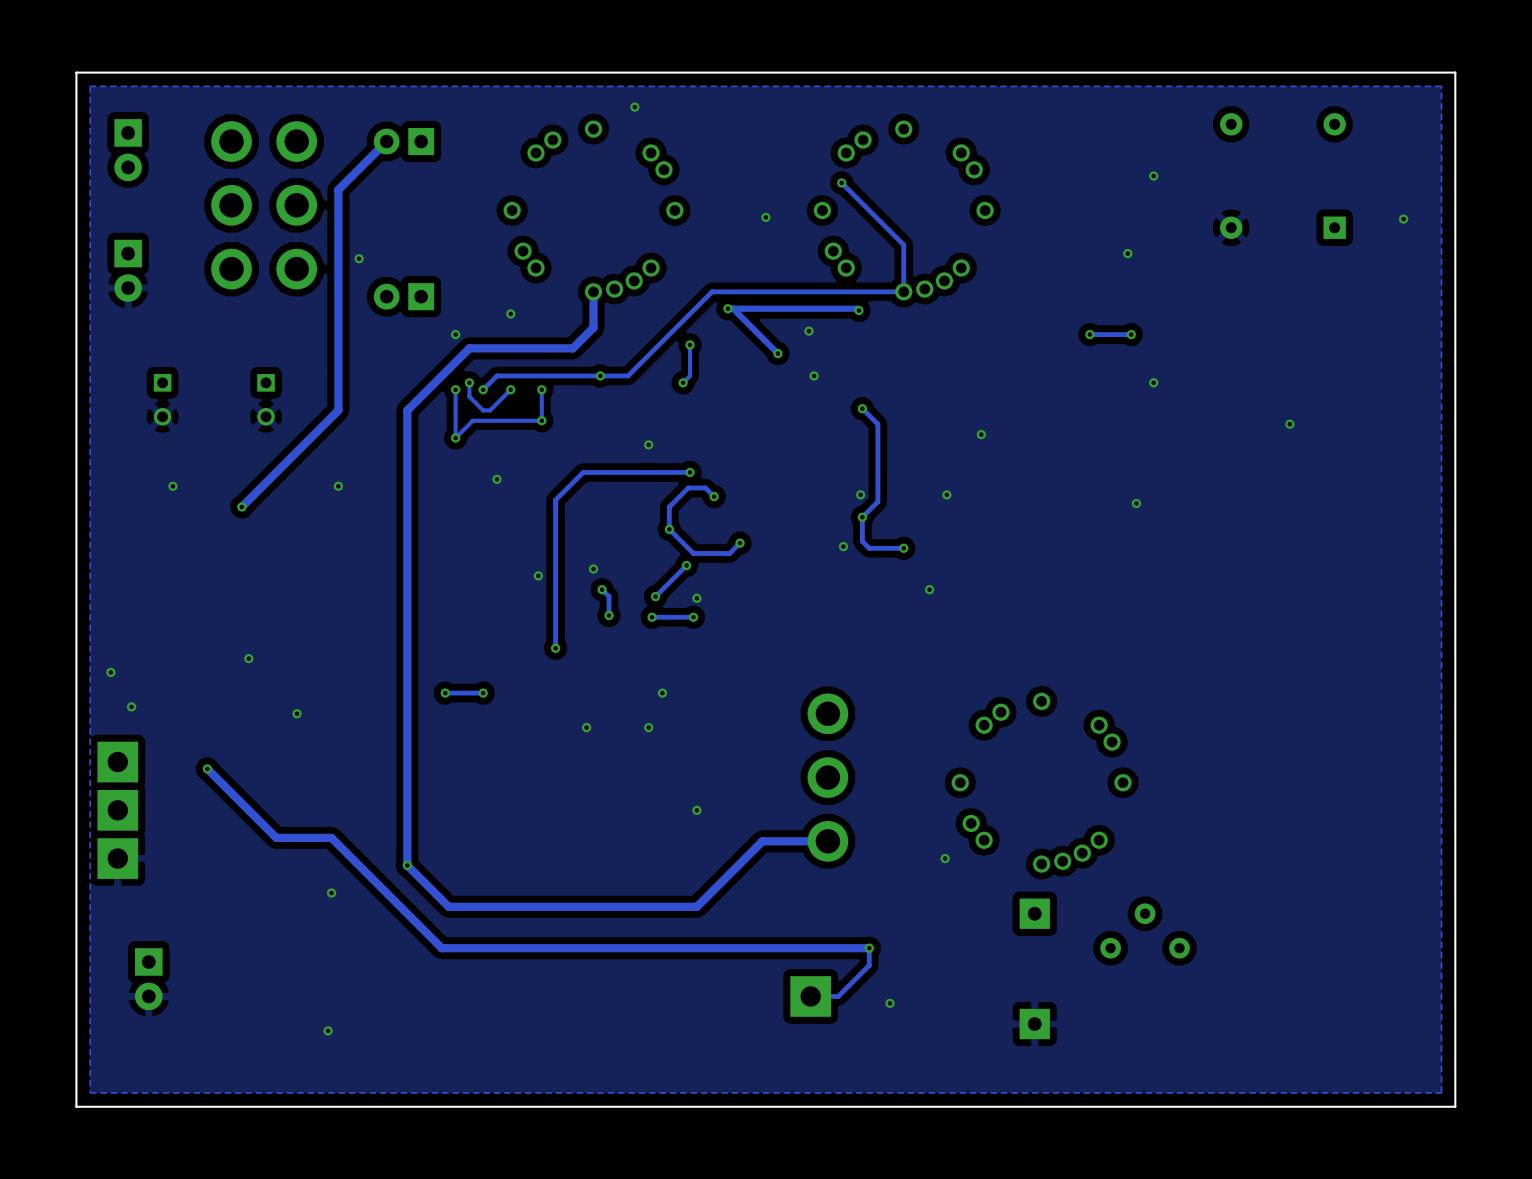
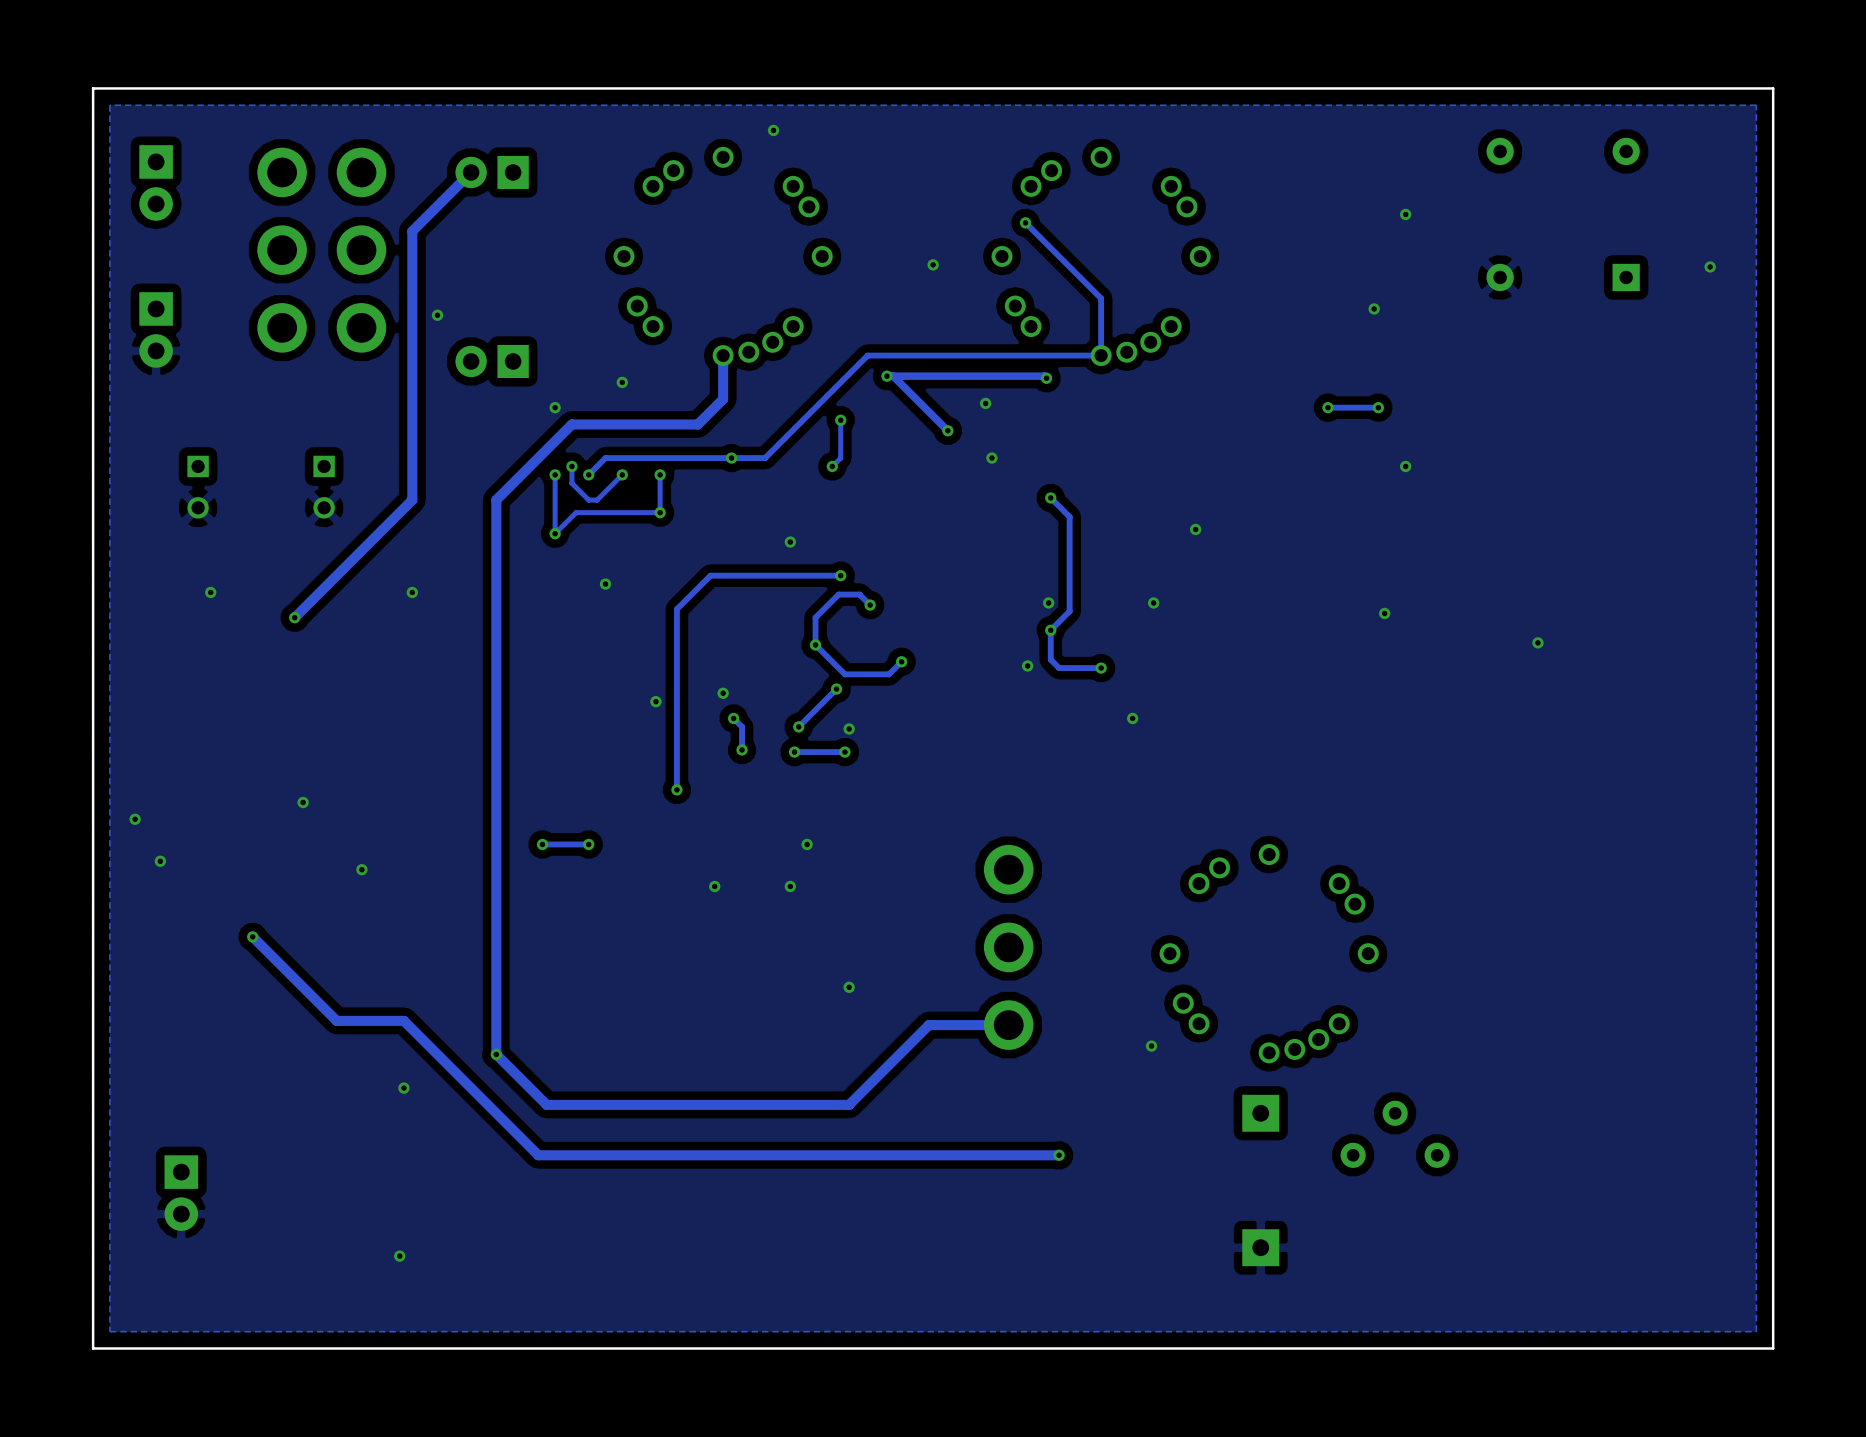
via: (1289, 424) -> none
via: none -> (1537, 642)
part: (117, 762) -> none
part: (117, 810) -> none
part: (117, 858) -> none
track: (869, 948) (869, 965) (838, 996) (810, 996) -> none
part: (810, 996) -> none
via: (889, 1003) -> none

